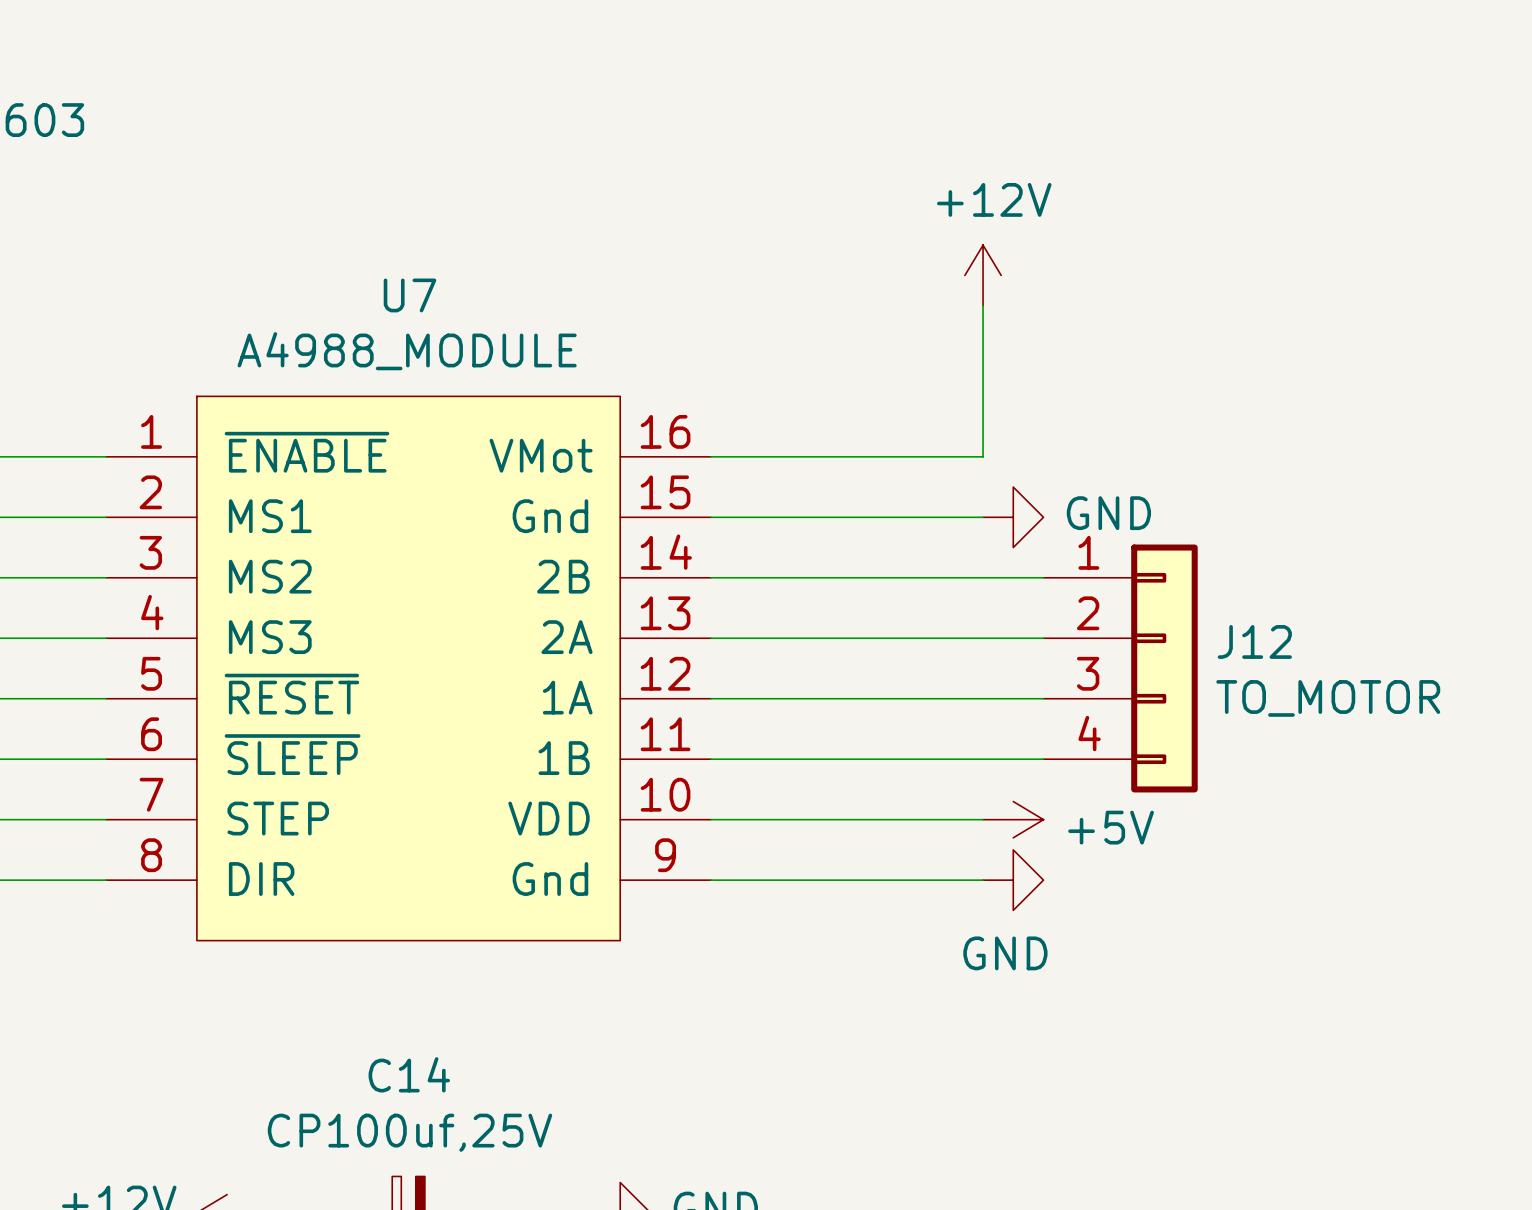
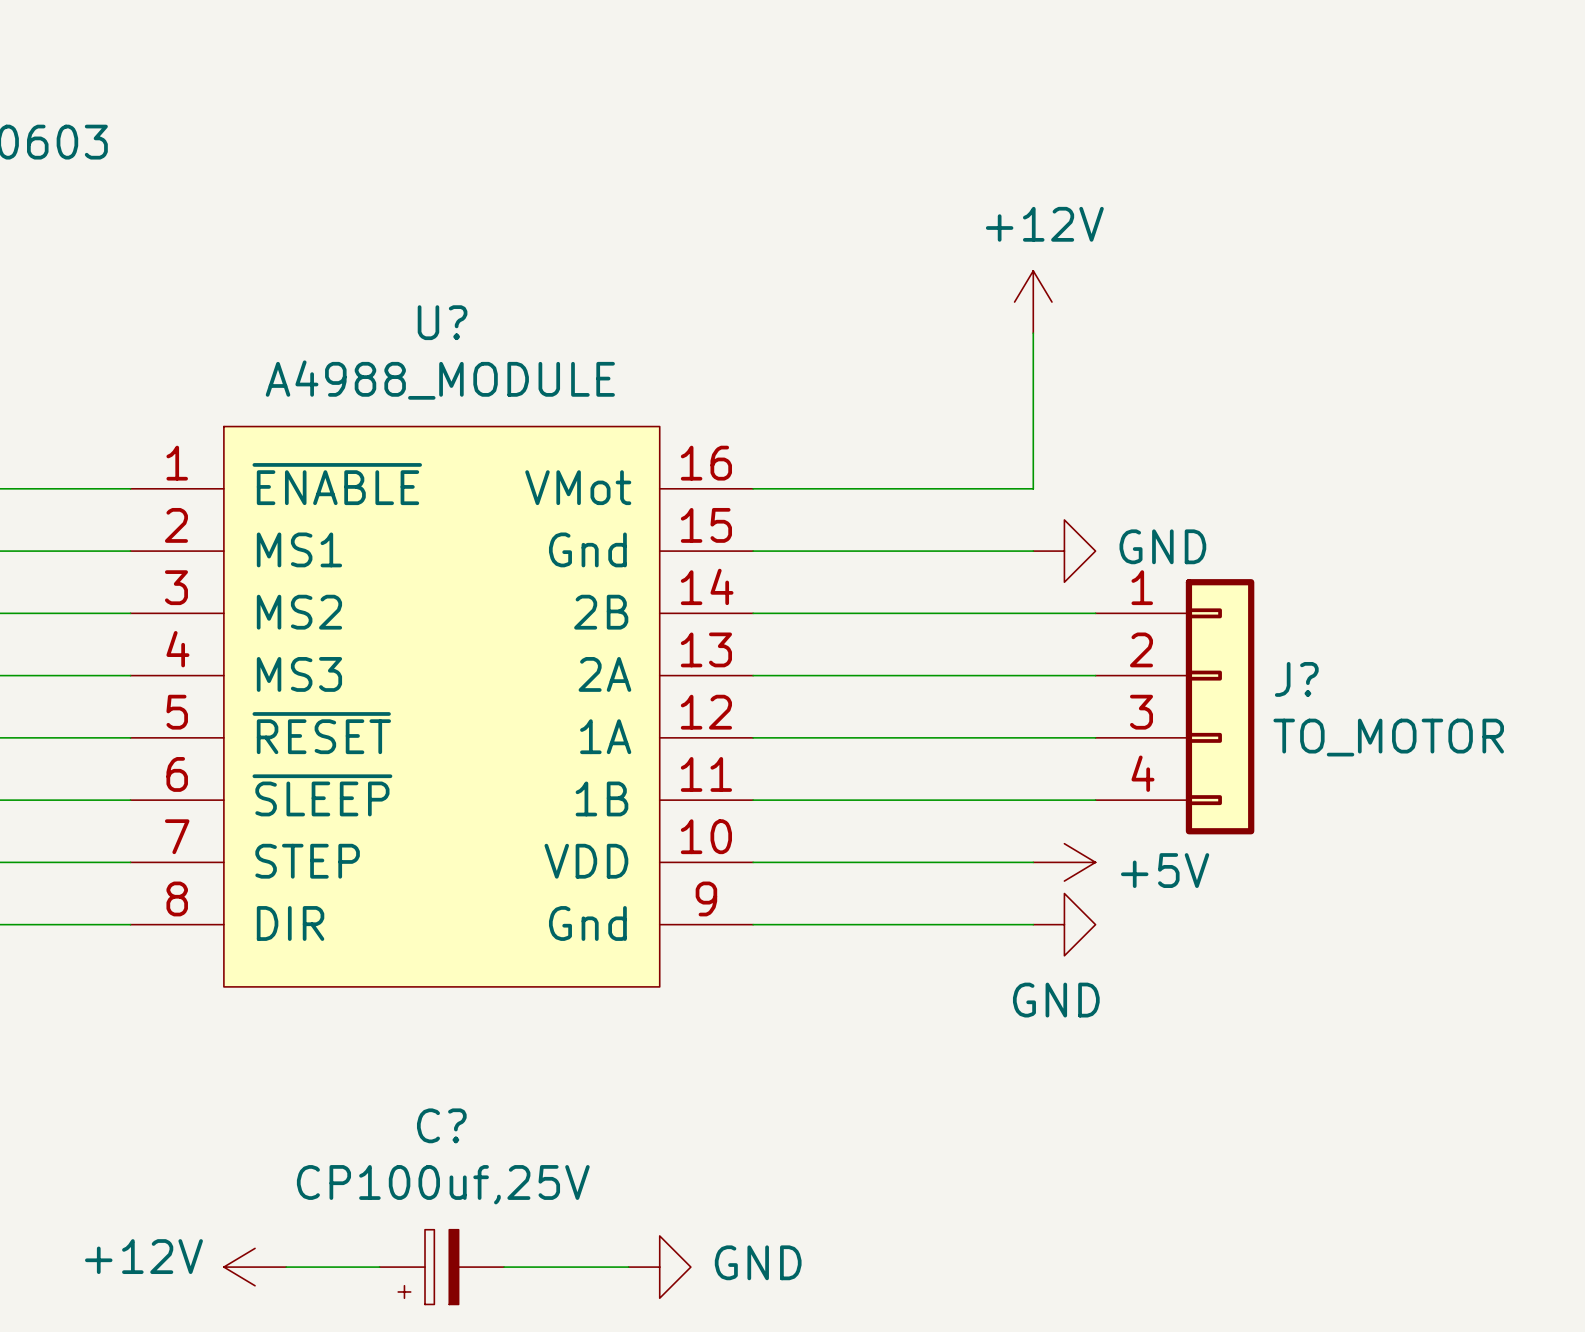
U7 name: U7 (409, 295) -> U? (442, 322)
J12 name: J12 (1254, 641) -> J? (1296, 679)
C14 name: C14 (409, 1074) -> C? (441, 1125)

